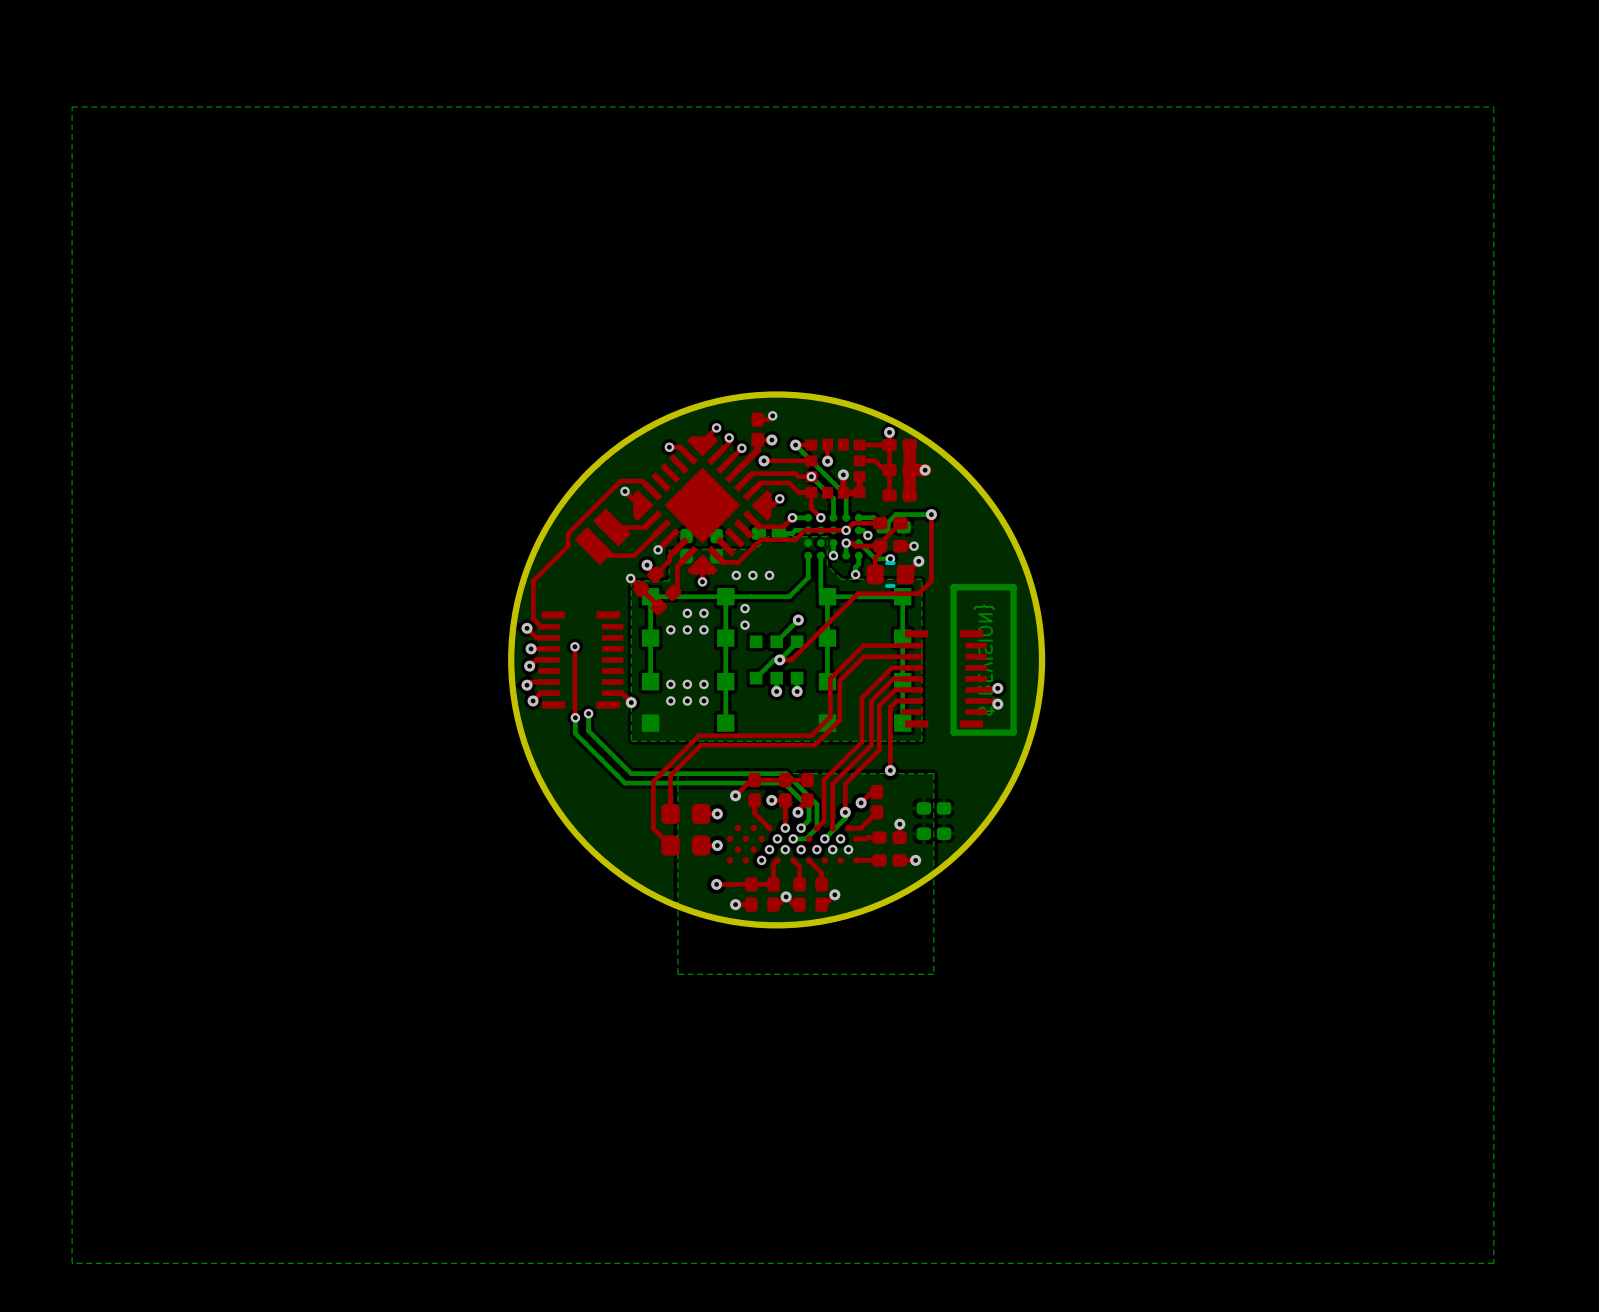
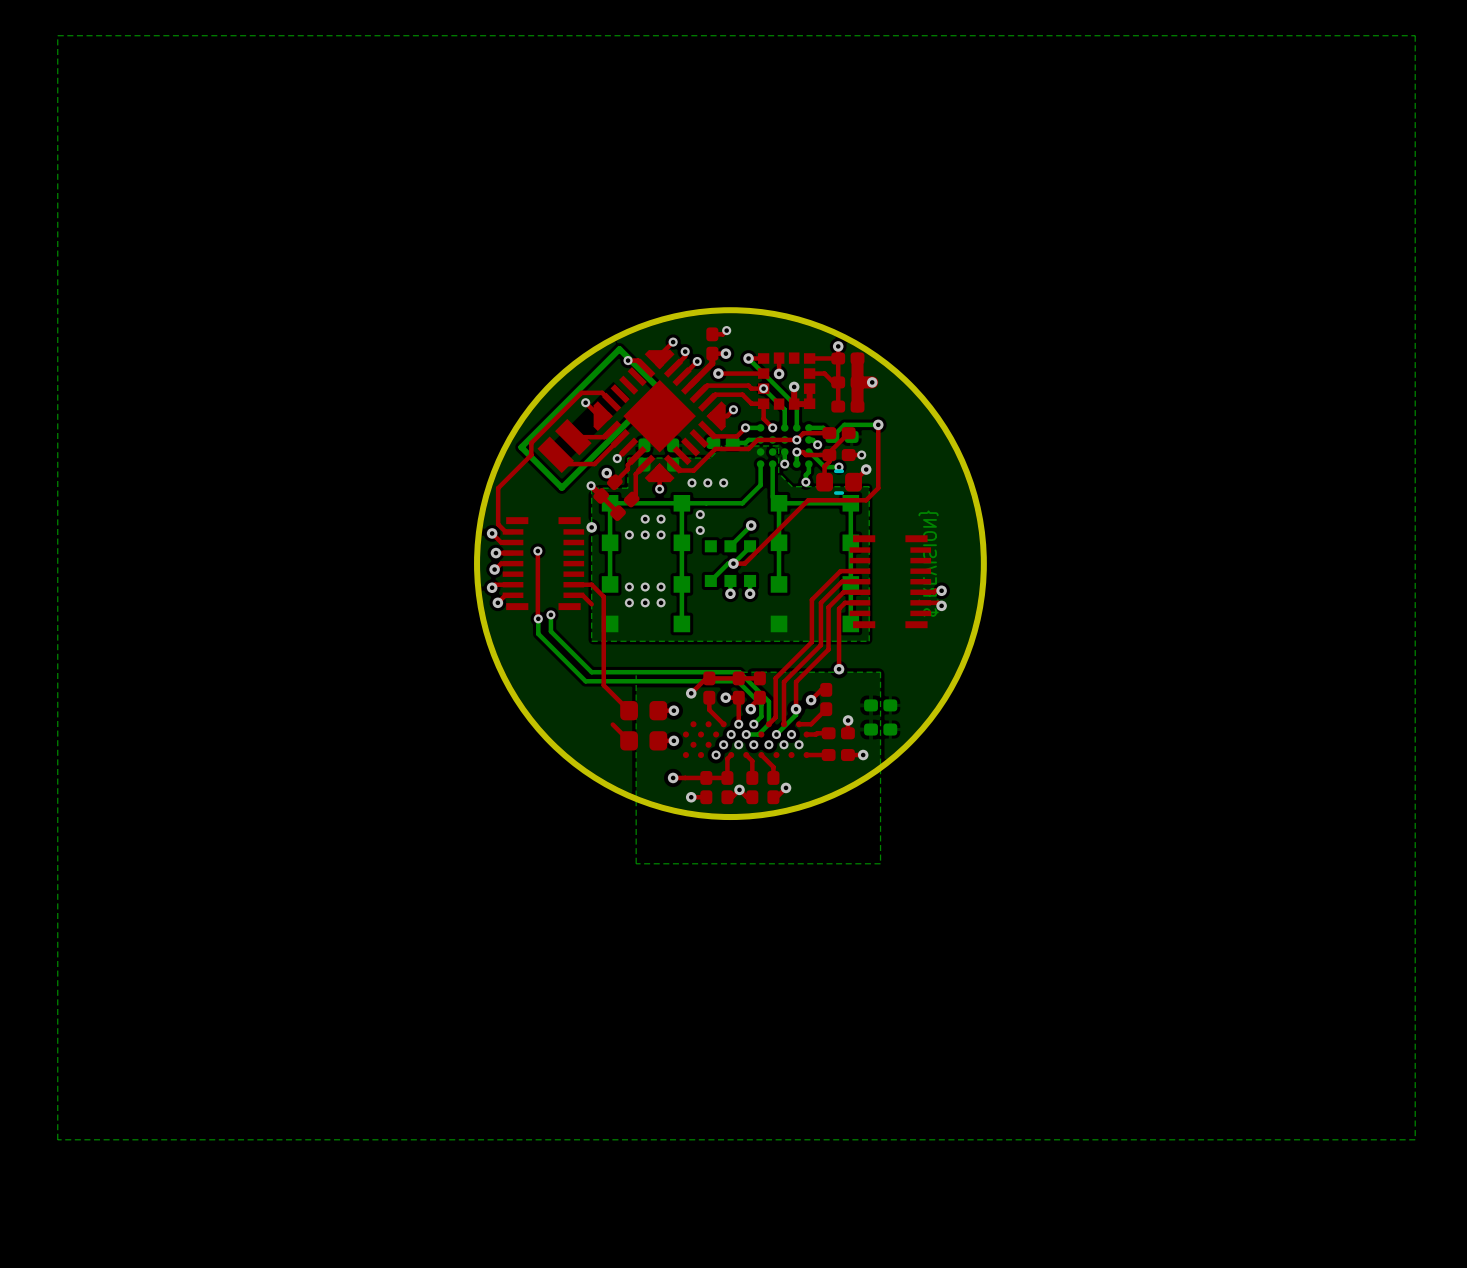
bottom track: none -> (619, 349) (660, 389) (561, 487) (521, 447) (619, 349)
bottom track: (953, 587) (1013, 587) (1013, 732) (953, 732) (953, 587) -> none
top track: (912, 645) (863, 645) (830, 678) (830, 716) (811, 735) (699, 735) (653, 781) (653, 828) -> none
top track: (912, 656) (863, 656) (839, 680) (839, 720) (814, 745) (700, 745) (670, 775) (670, 813) -> (573, 584) (591, 584) (603, 596) (603, 685) (629, 710)
via position: (631, 702) -> (591, 527)

